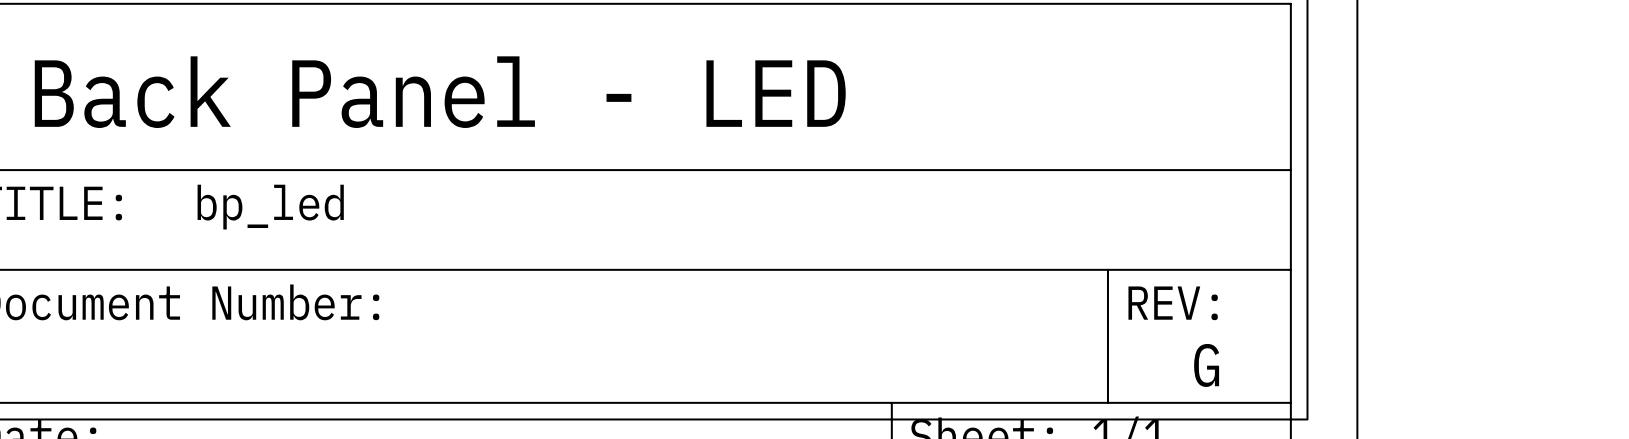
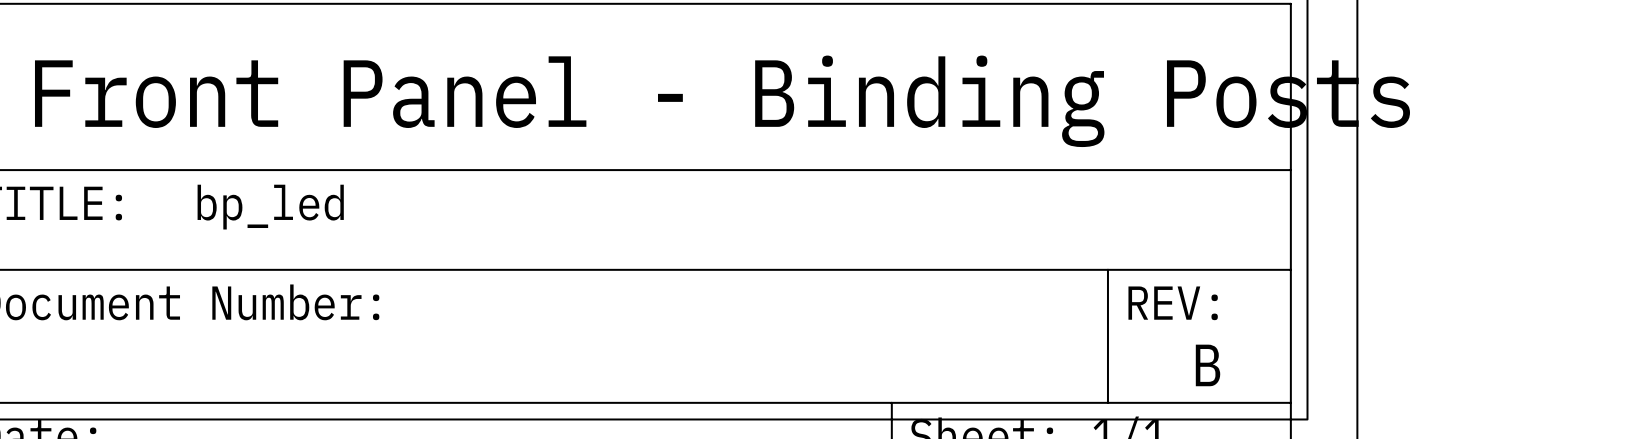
text: Back Panel - LED (440, 92) -> Front Panel - Binding Posts (722, 101)
text: G (1206, 365) -> B (1208, 365)

